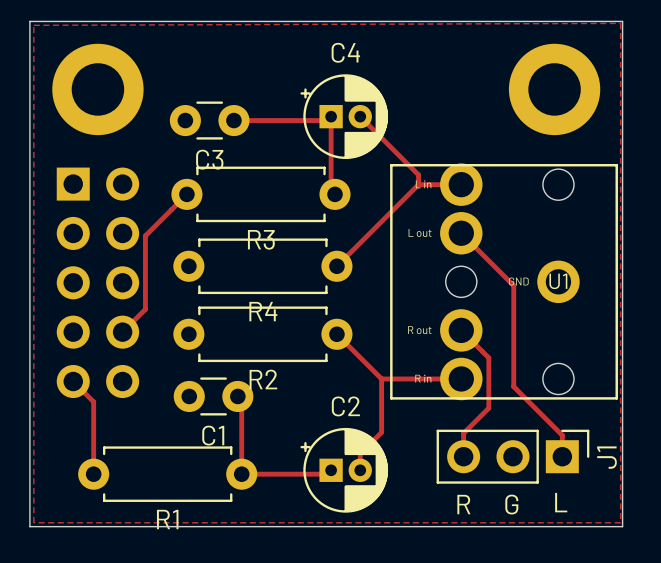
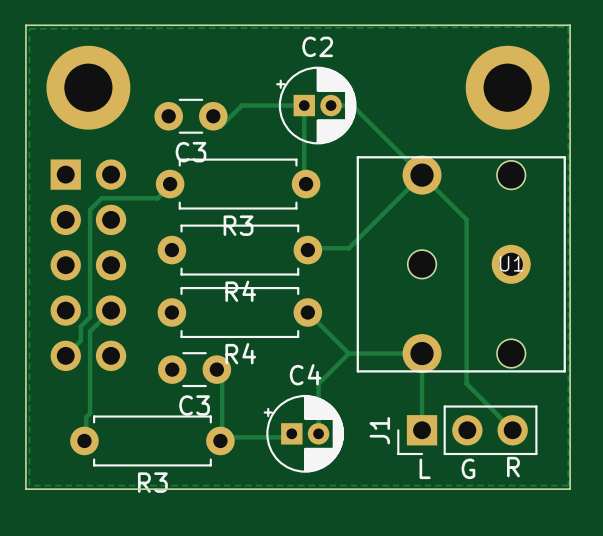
track: none -> (331, 105) (352, 105) (466, 219) (466, 383) (512, 430)
C4 position: (344, 116) -> (303, 433)
track: (360, 116) (418, 174) (418, 184) -> none
track: (233, 120) (327, 120) (331, 116) (331, 190) (335, 194) -> none
track: none -> (220, 126) (241, 105) (304, 105) (304, 180) (307, 184)
U1 footprint: [390, 163, 618, 401] -> [356, 155, 566, 374]
track: (418, 184) (461, 184) -> (306, 248) (348, 248) (422, 175)
track: (418, 184) (336, 266) -> none
track: (186, 194) (145, 235) (145, 309) (122, 332) -> (86, 437) (86, 417) (90, 413) (90, 331) (111, 310)
track: (461, 233) (513, 285) (513, 386) (562, 435) (562, 456) -> none
track: (461, 330) (488, 357) (488, 408) (463, 433) (463, 456) -> none
track: (381, 378) (381, 432) (360, 453) (360, 470) -> (348, 353) (318, 383) (318, 433)
track: none -> (422, 353) (422, 430)
R2 name: R2 (263, 379) -> R4 (240, 353)
track: (73, 381) (93, 401) (93, 474) -> (65, 355) (80, 340) (80, 326) (90, 317) (90, 209) (101, 198) (157, 198) (171, 184)
track: none -> (216, 366) (222, 371) (222, 437) (288, 437) (291, 433)
track: (237, 396) (241, 400) (241, 474) (327, 474) (331, 470) -> none
C1 name: C1 (213, 435) -> C3 (194, 405)
J1 rotation: 0° (512, 456) -> 180° (467, 430)
C2 position: (344, 470) -> (316, 105)
text: L (561, 502) -> R (513, 467)
text: R (463, 504) -> L (425, 468)
R1 name: R1 (167, 519) -> R3 (152, 482)

